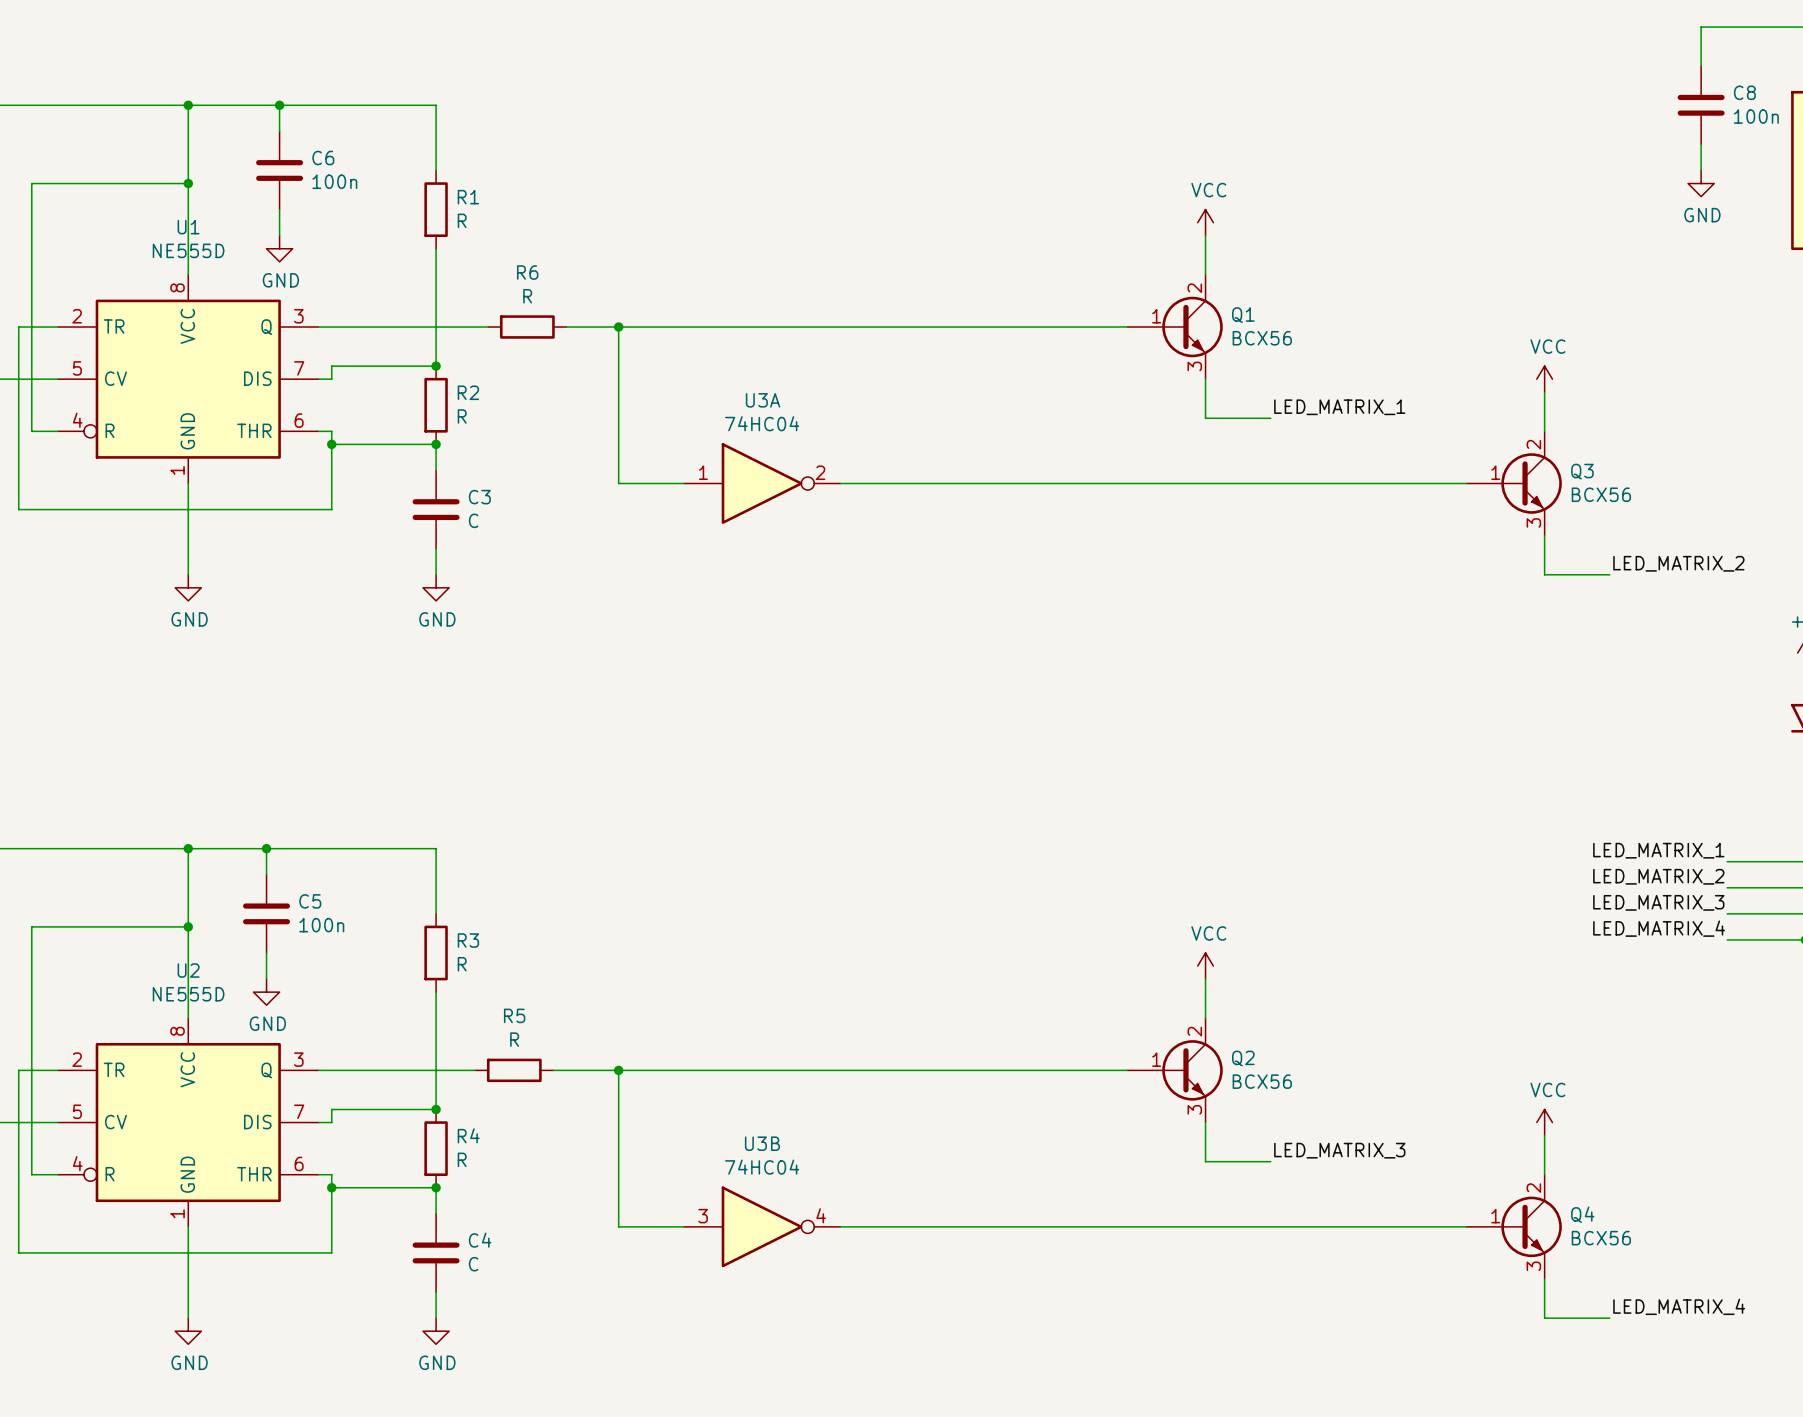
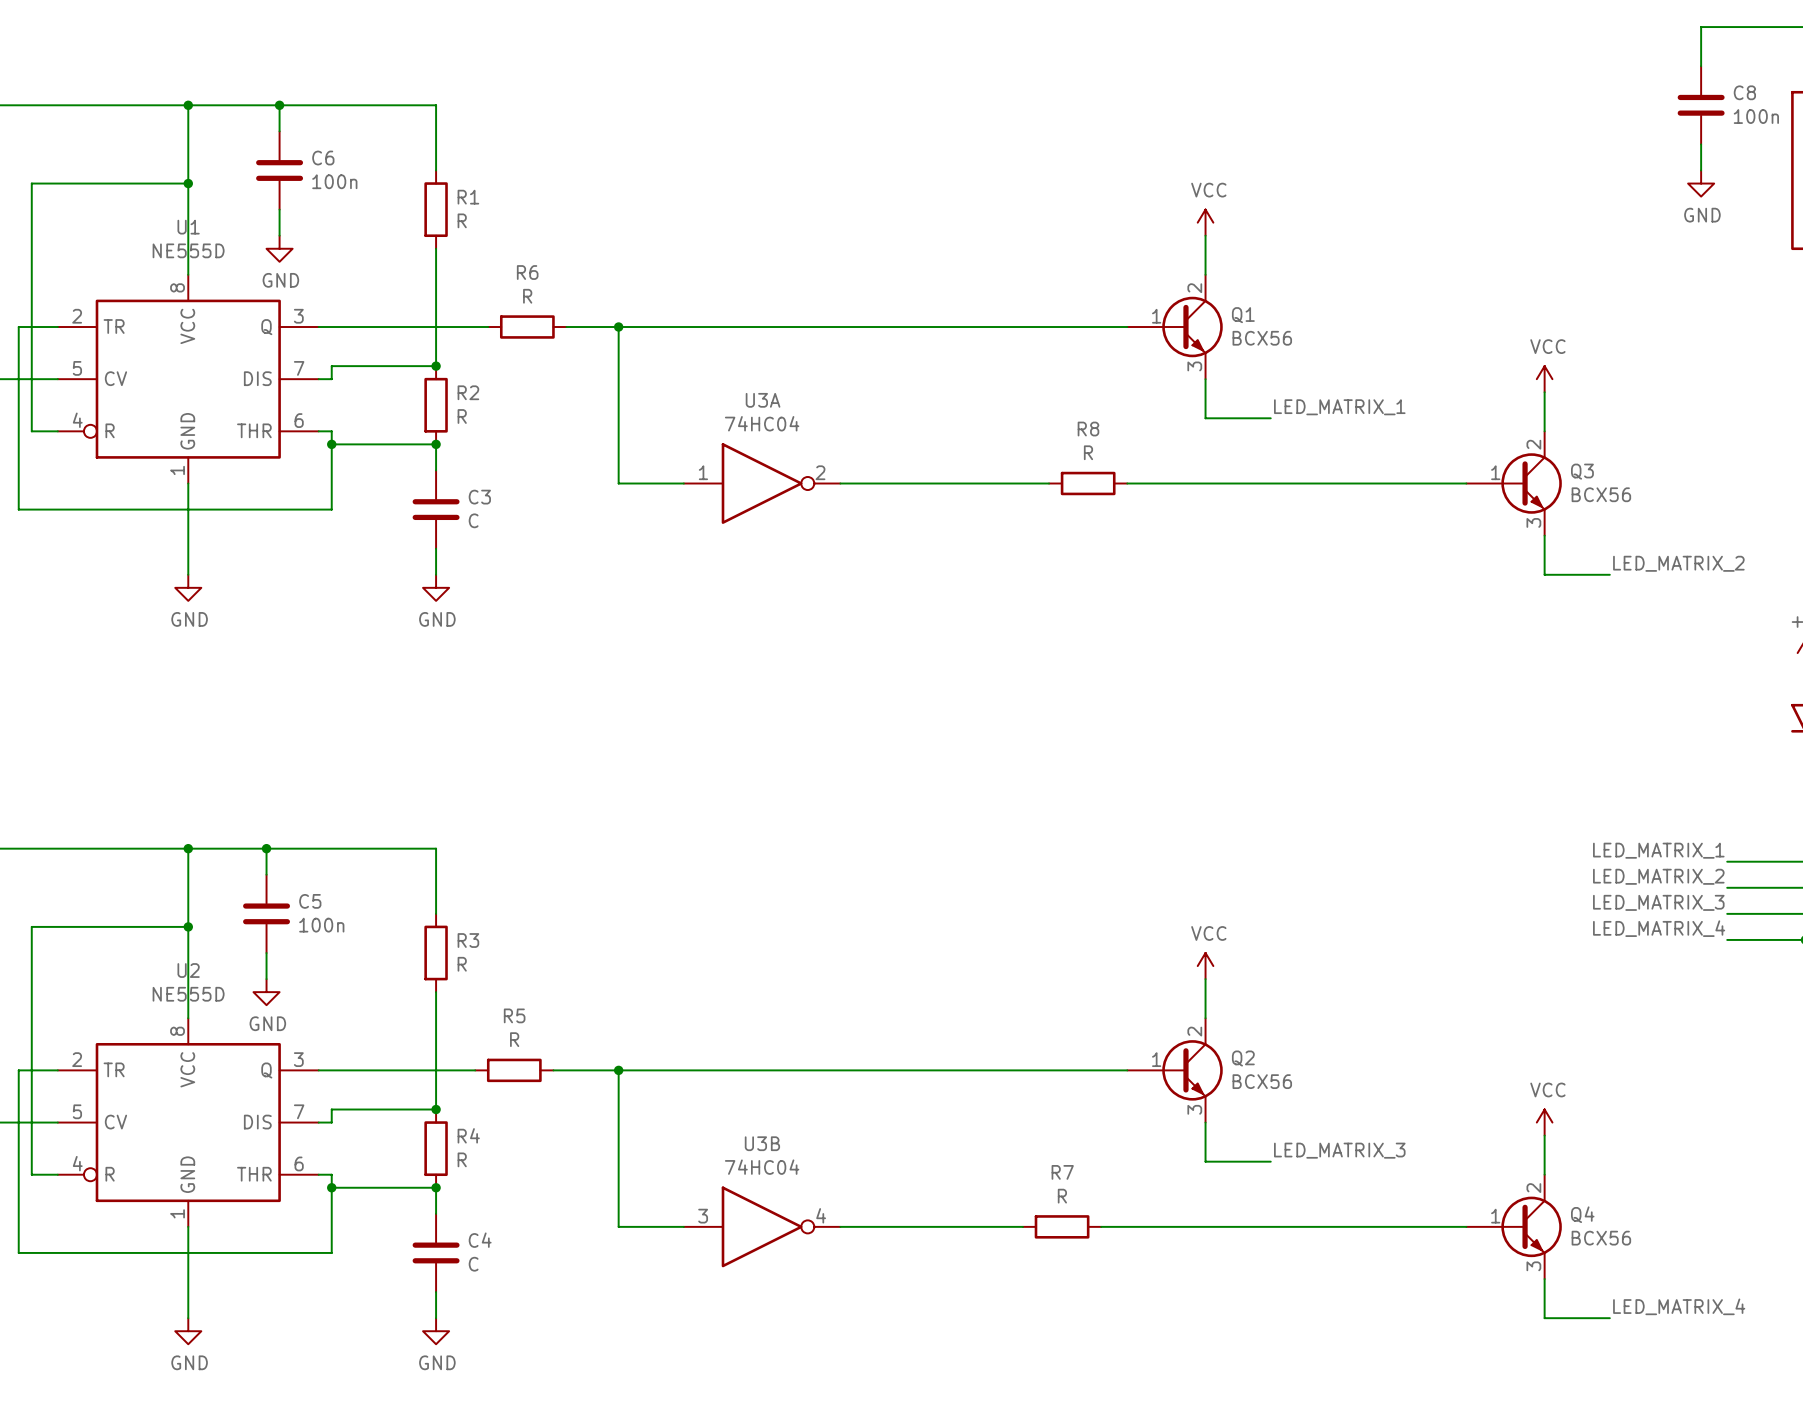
wire: (1049, 483) (1127, 483) -> none
R8: none -> R (1088, 483)
wire: (1022, 1226) (1101, 1226) -> none
R7: none -> R (1062, 1226)

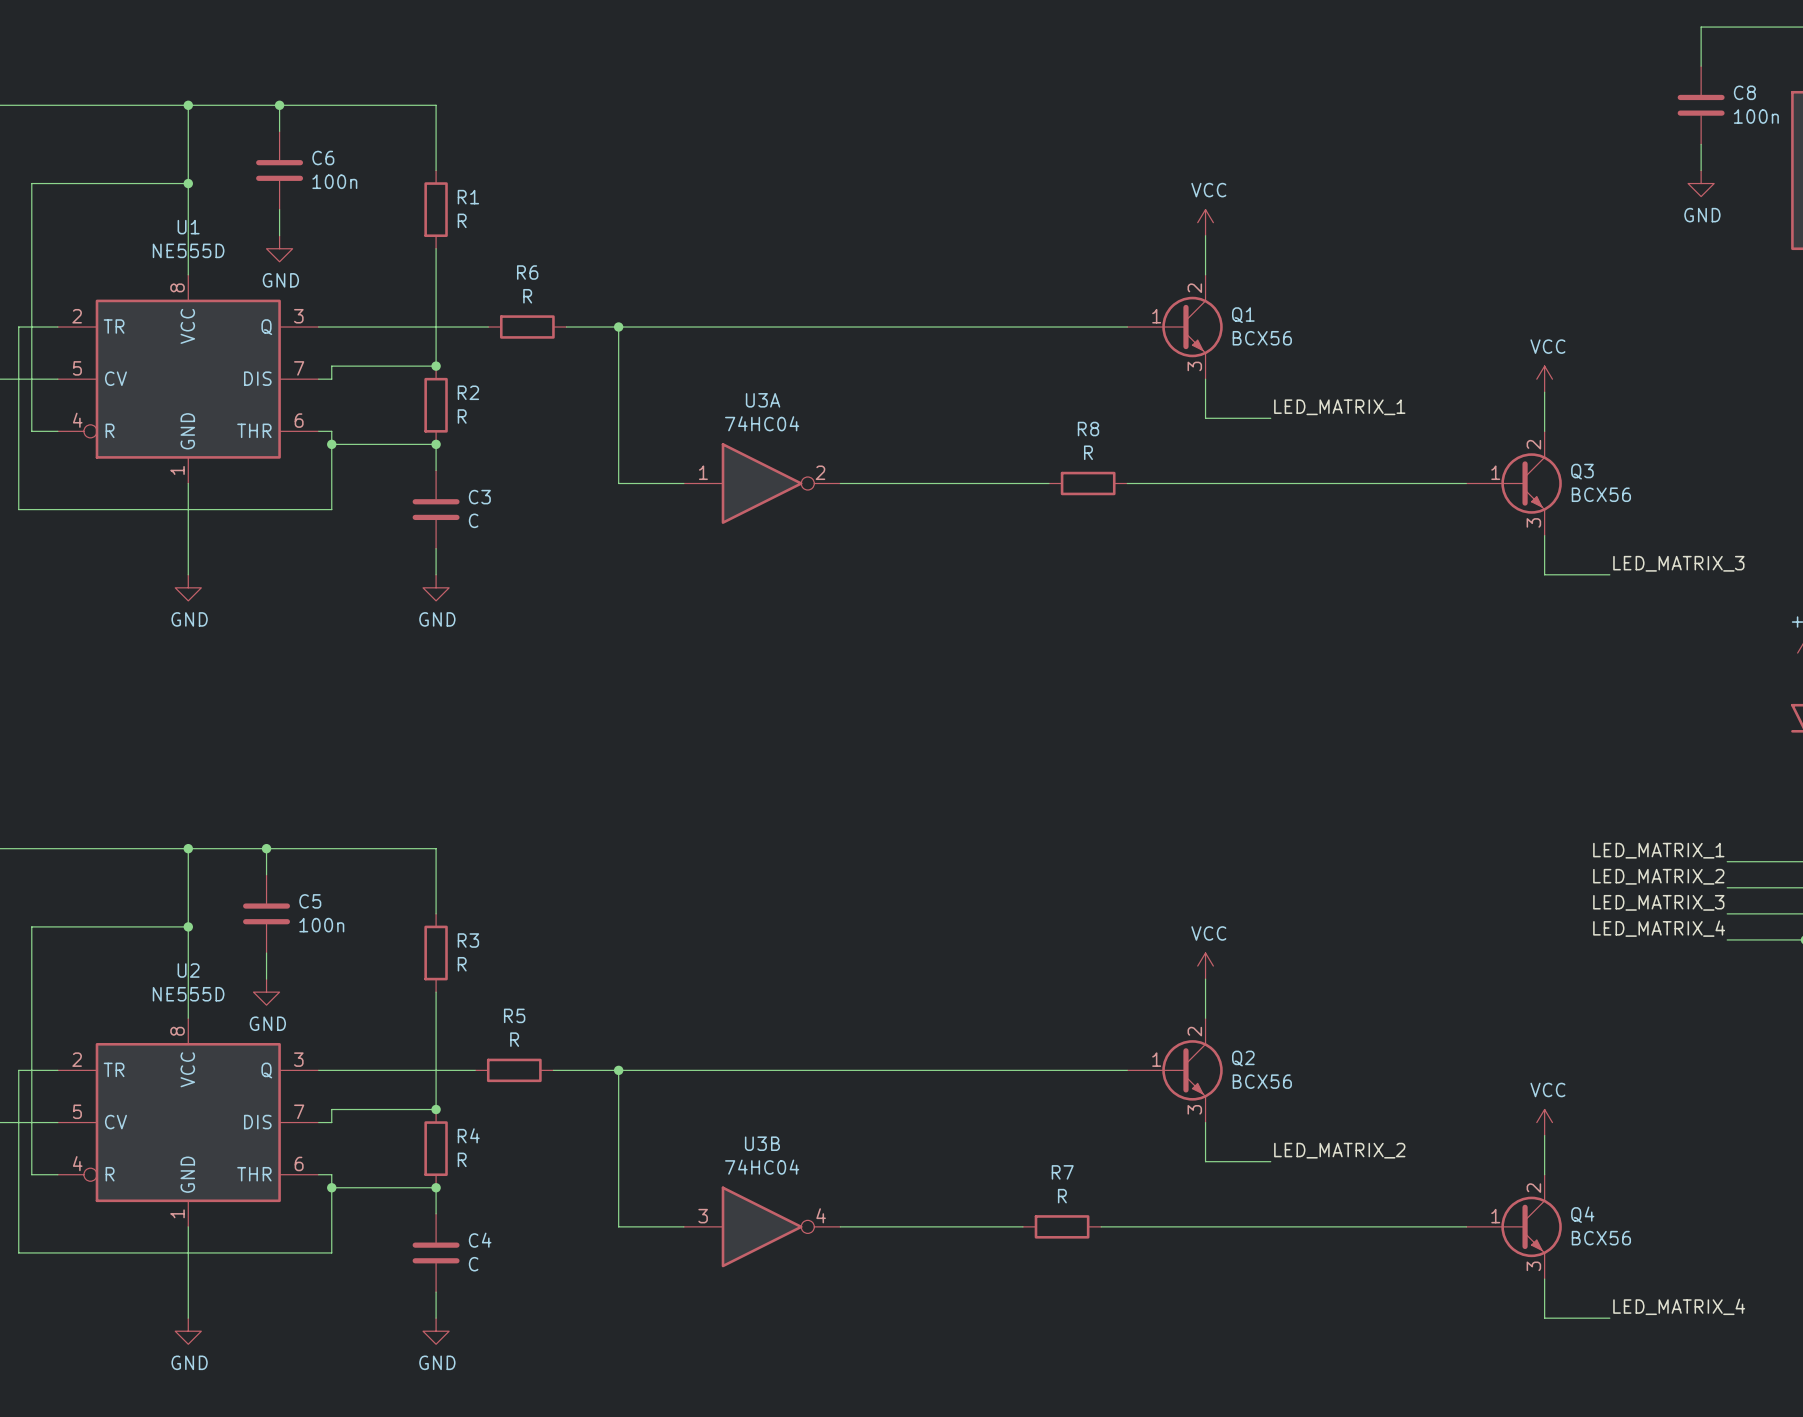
label: LED_MATRIX_2 (1678, 563) -> LED_MATRIX_3 (1678, 563)
label: LED_MATRIX_3 (1339, 1150) -> LED_MATRIX_2 (1339, 1150)

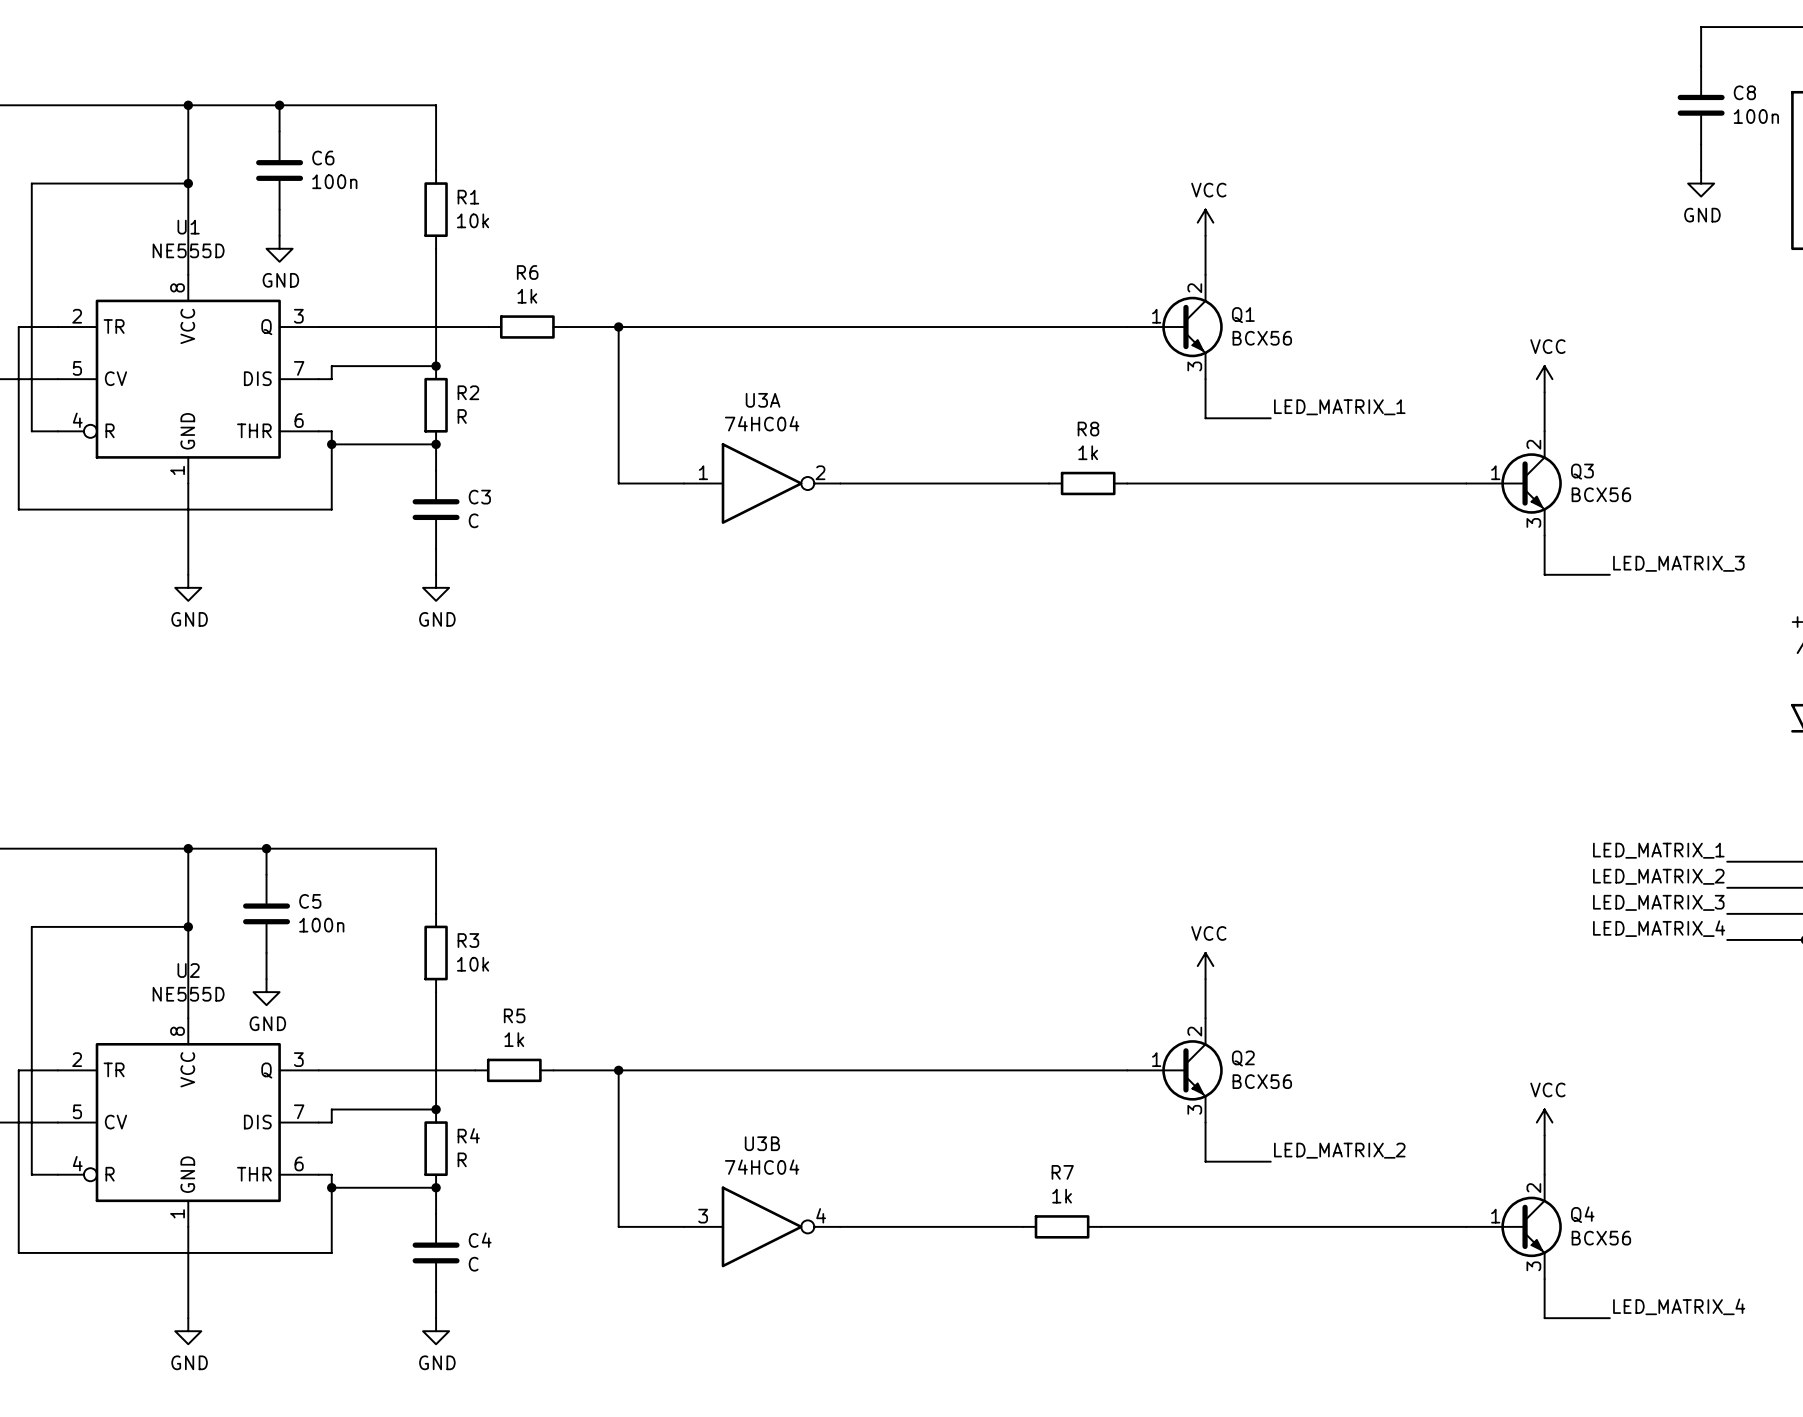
R1 value: R (462, 220) -> 10k (473, 220)
R6 value: R (527, 296) -> 1k (527, 296)
R8 value: R (1088, 452) -> 1k (1088, 452)
R3 value: R (462, 964) -> 10k (473, 964)
R5 value: R (514, 1039) -> 1k (514, 1039)
R7 value: R (1062, 1196) -> 1k (1062, 1196)

